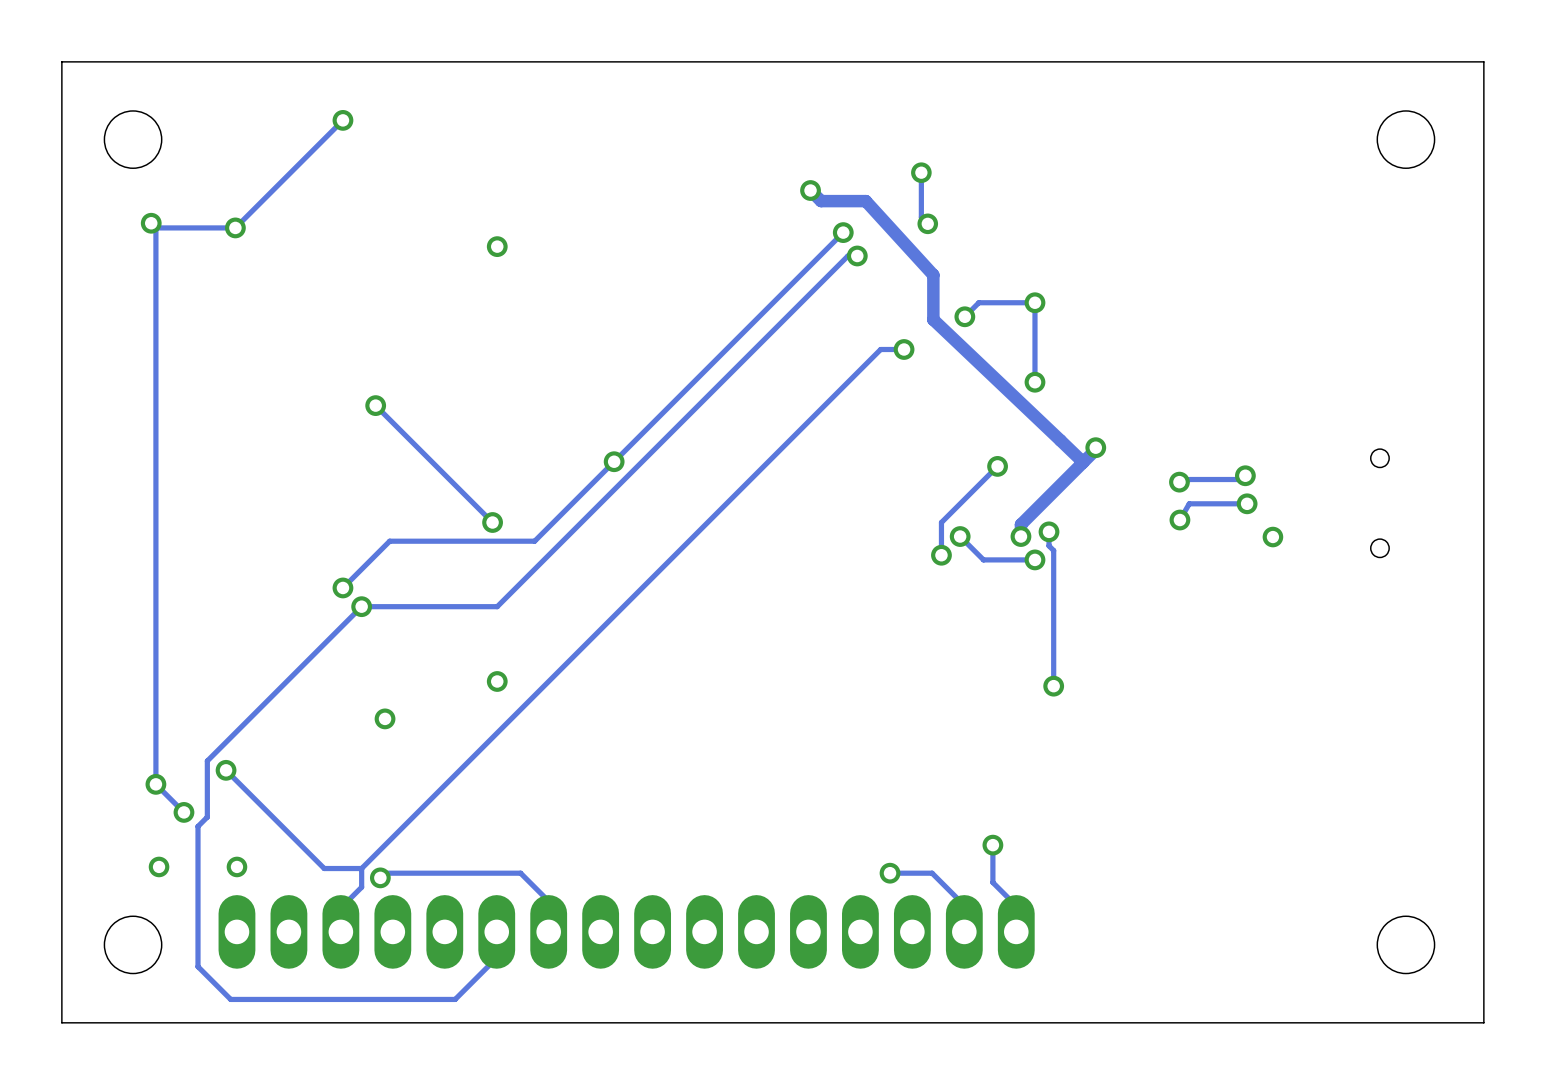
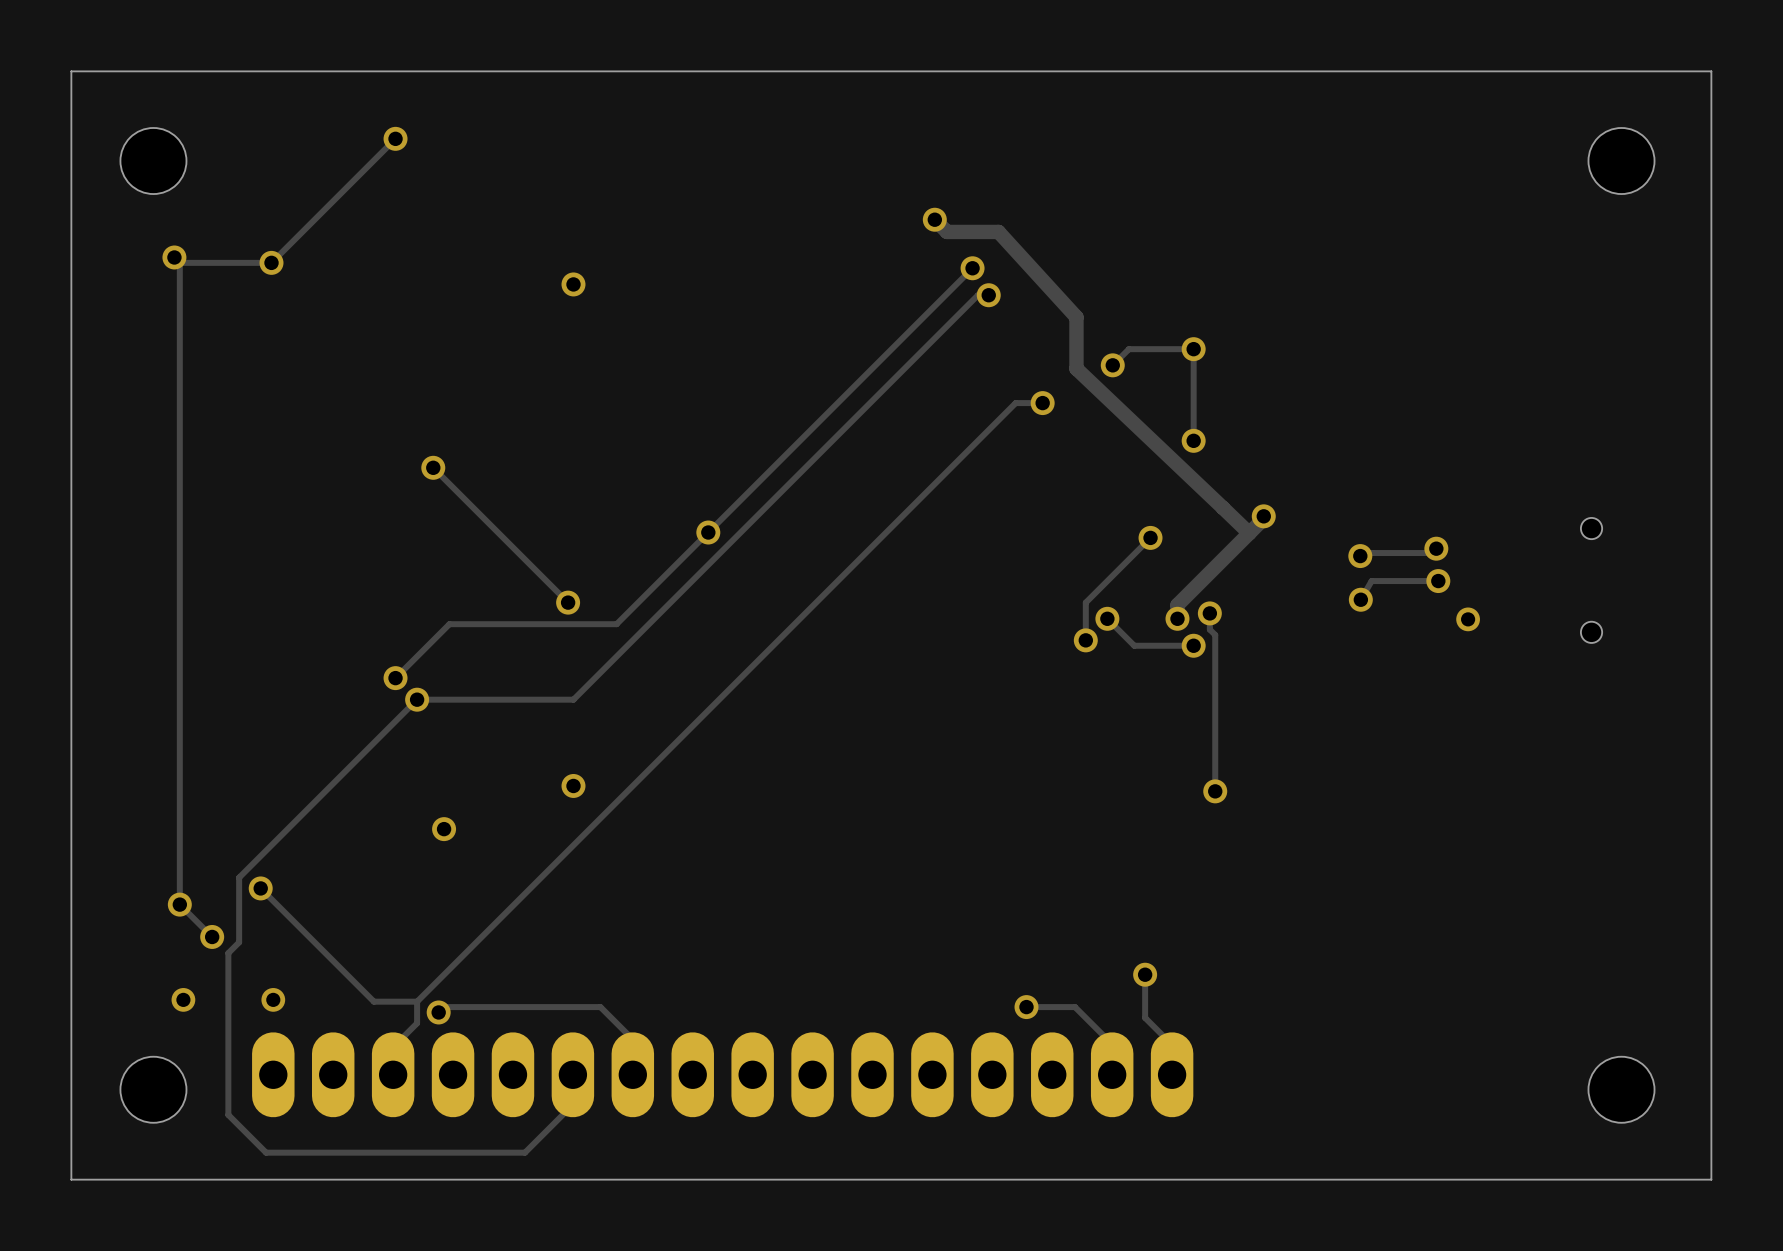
track: (921, 172) (921, 217) (927, 223) -> none
via: (921, 172) -> none
via: (927, 223) -> none

